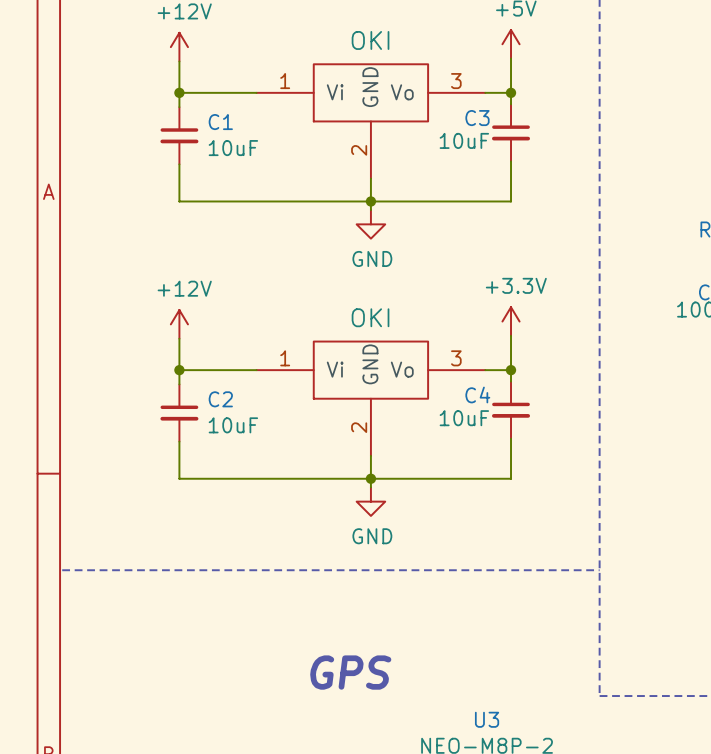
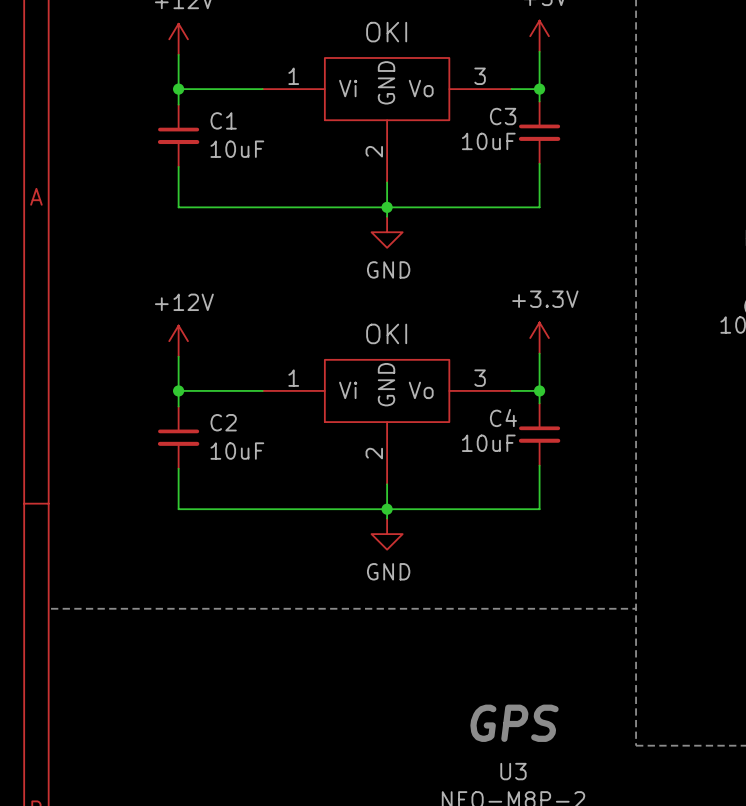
text position: GPS (350, 672) -> GPS (514, 723)

